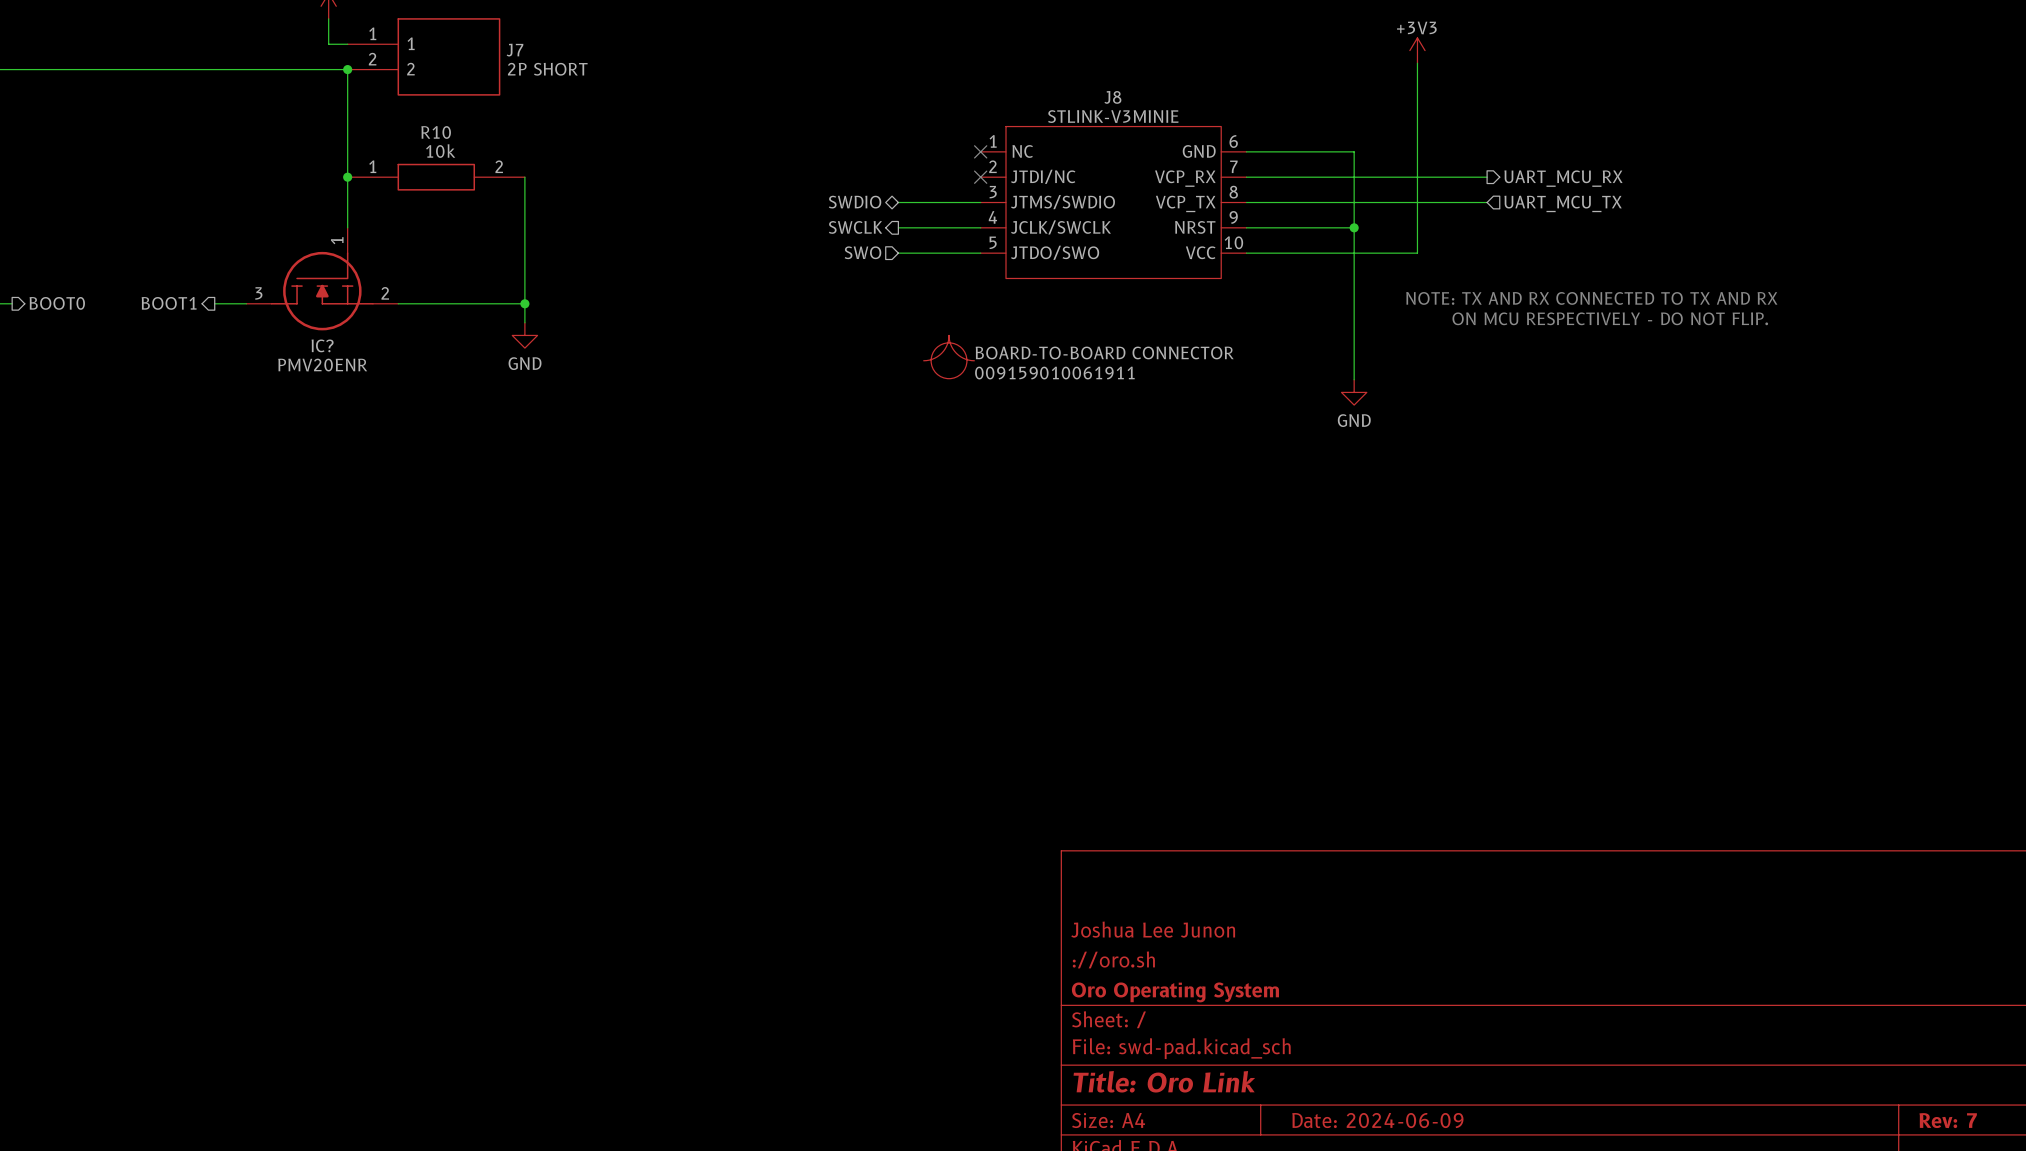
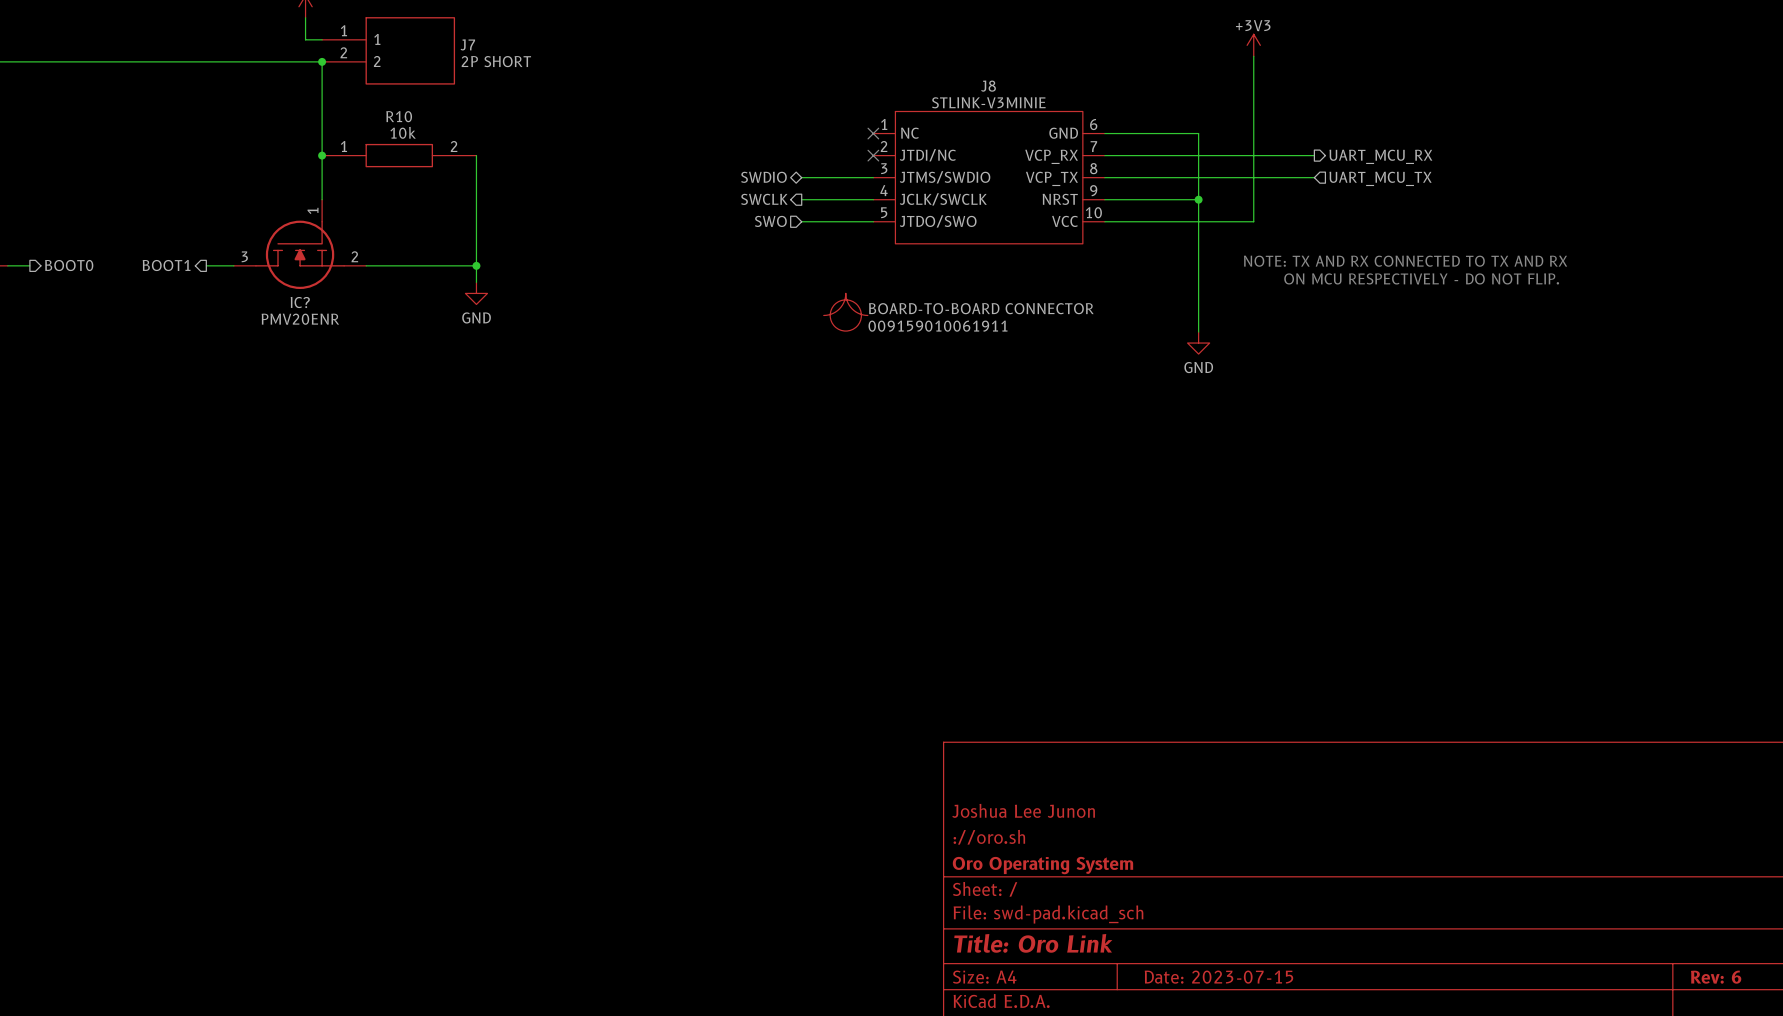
title block: Date: 2024-06-09 (1377, 1120) -> Date: 2023-07-15 (1218, 977)
title block: Rev: 7 (1948, 1120) -> Rev: 6 (1716, 977)

